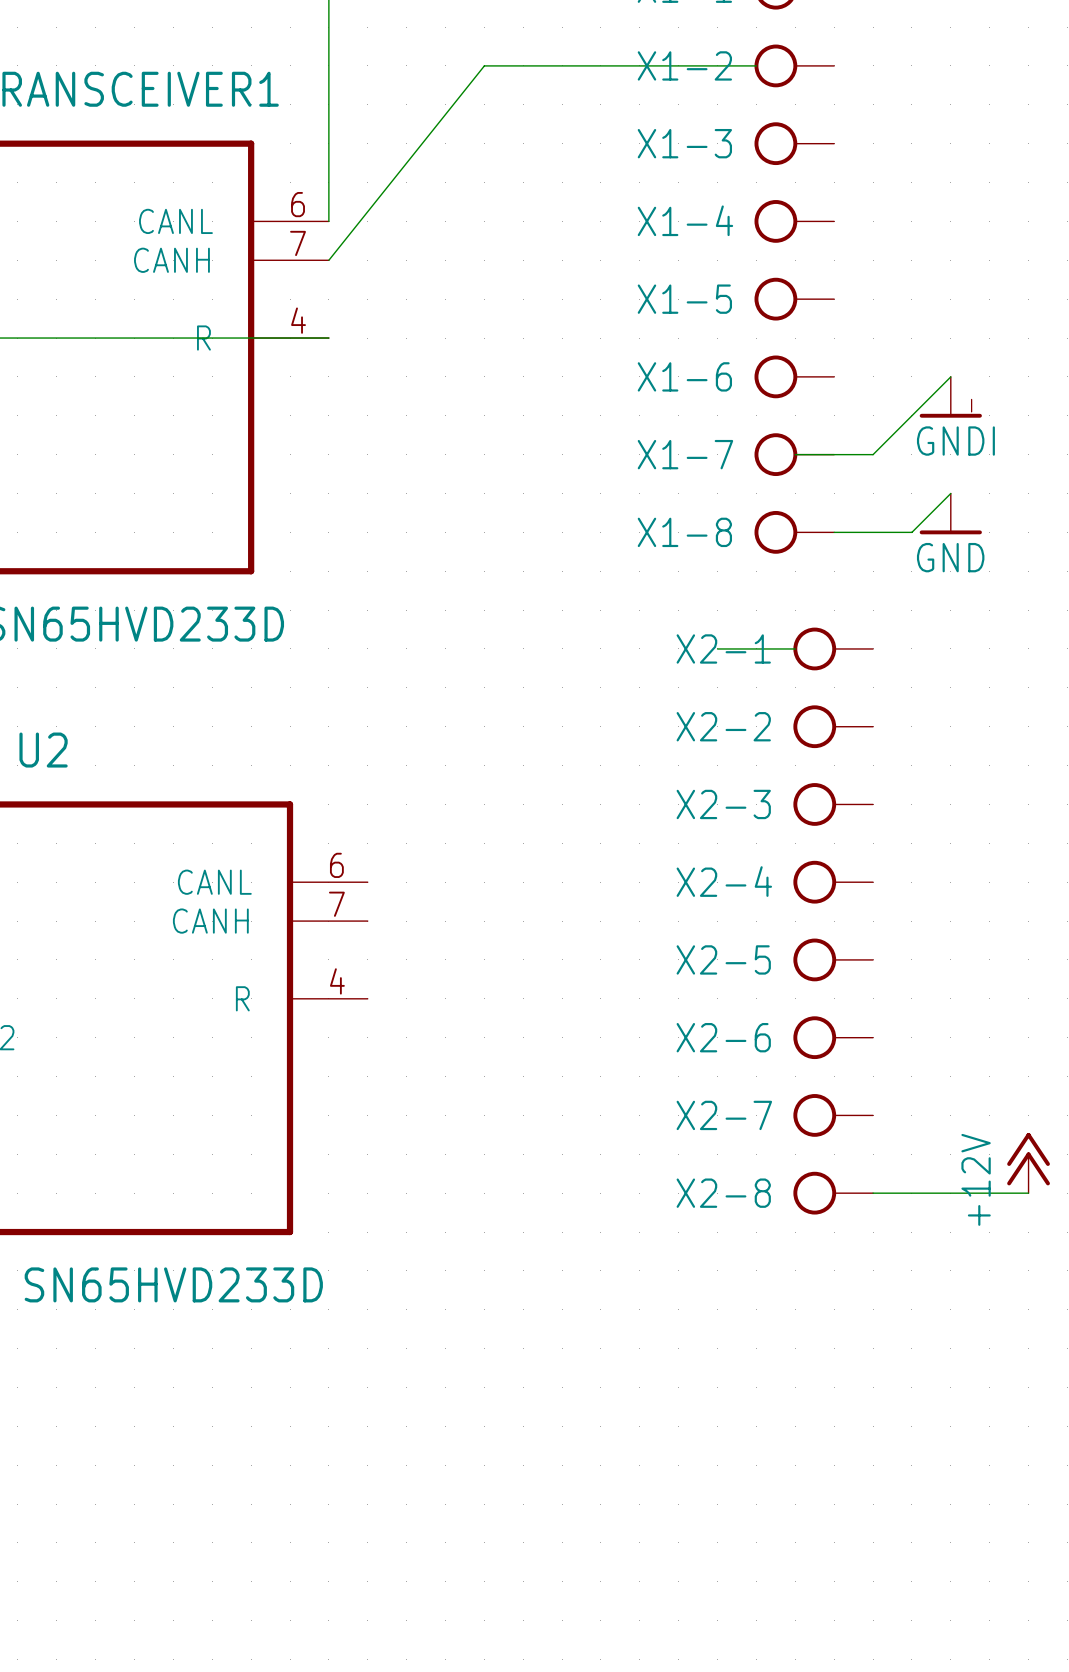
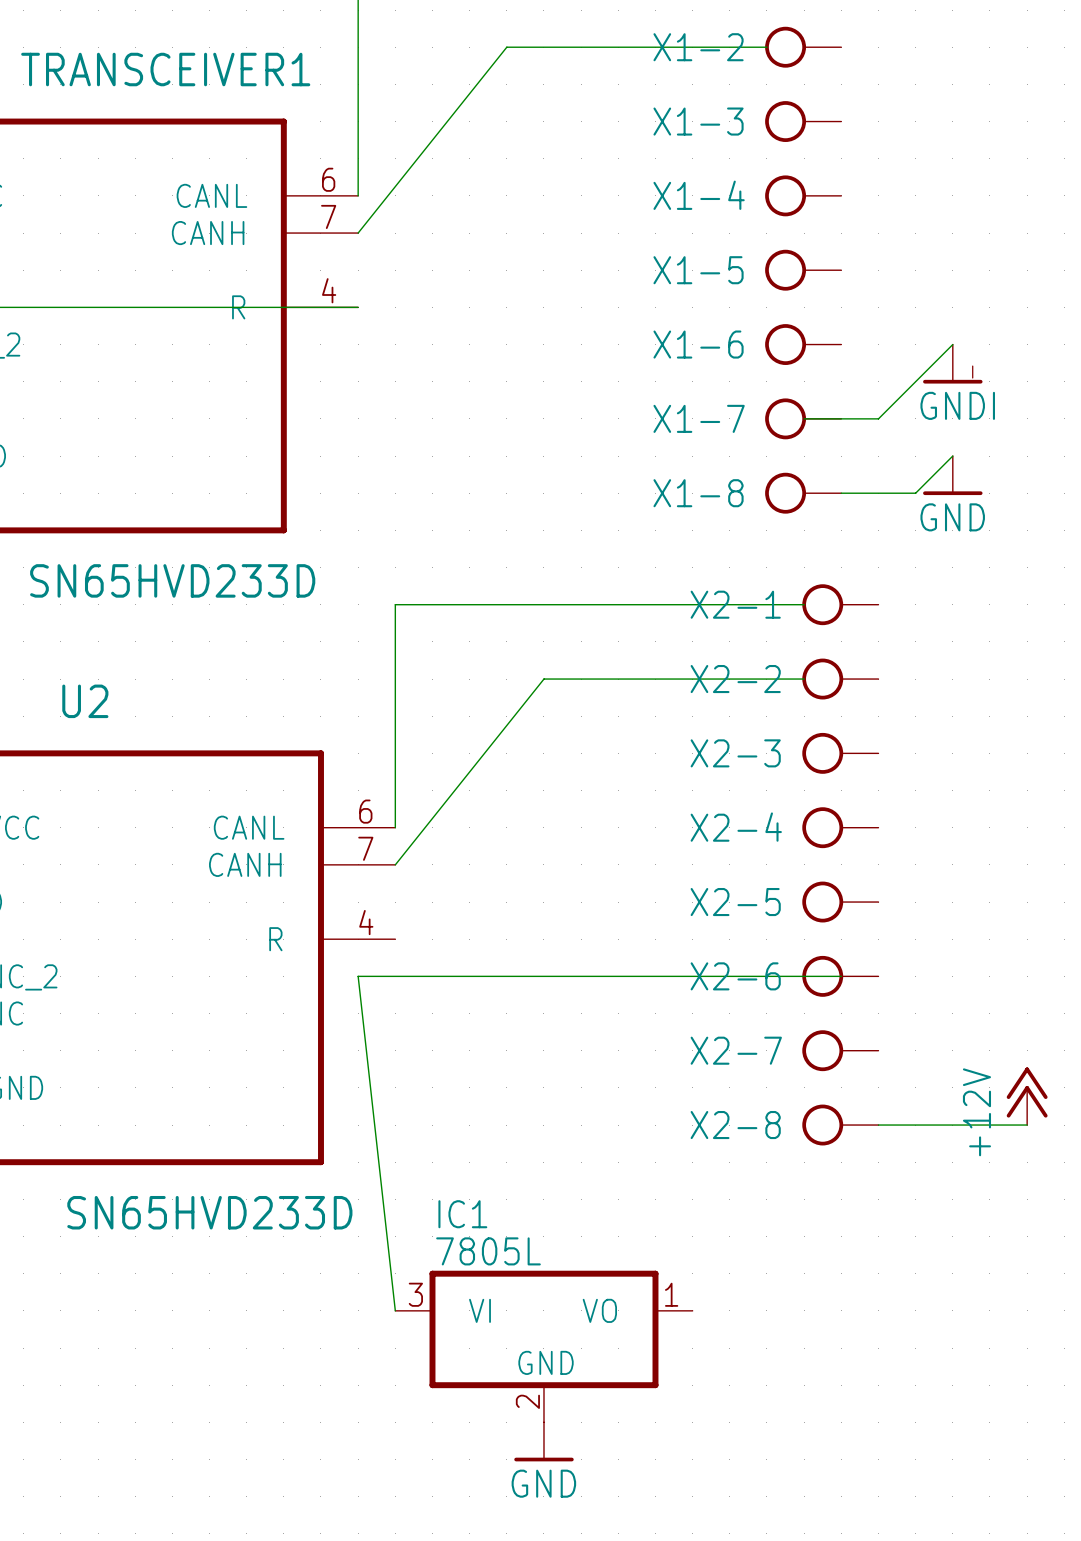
wire: none -> (729, 604) (395, 604) (395, 827)
wire: none -> (804, 679) (543, 679) (395, 864)
wire: none -> (841, 976) (358, 976) (395, 1310)
IC1: none -> 7805L (543, 1346)
power symbol: none -> GND (543, 1441)

